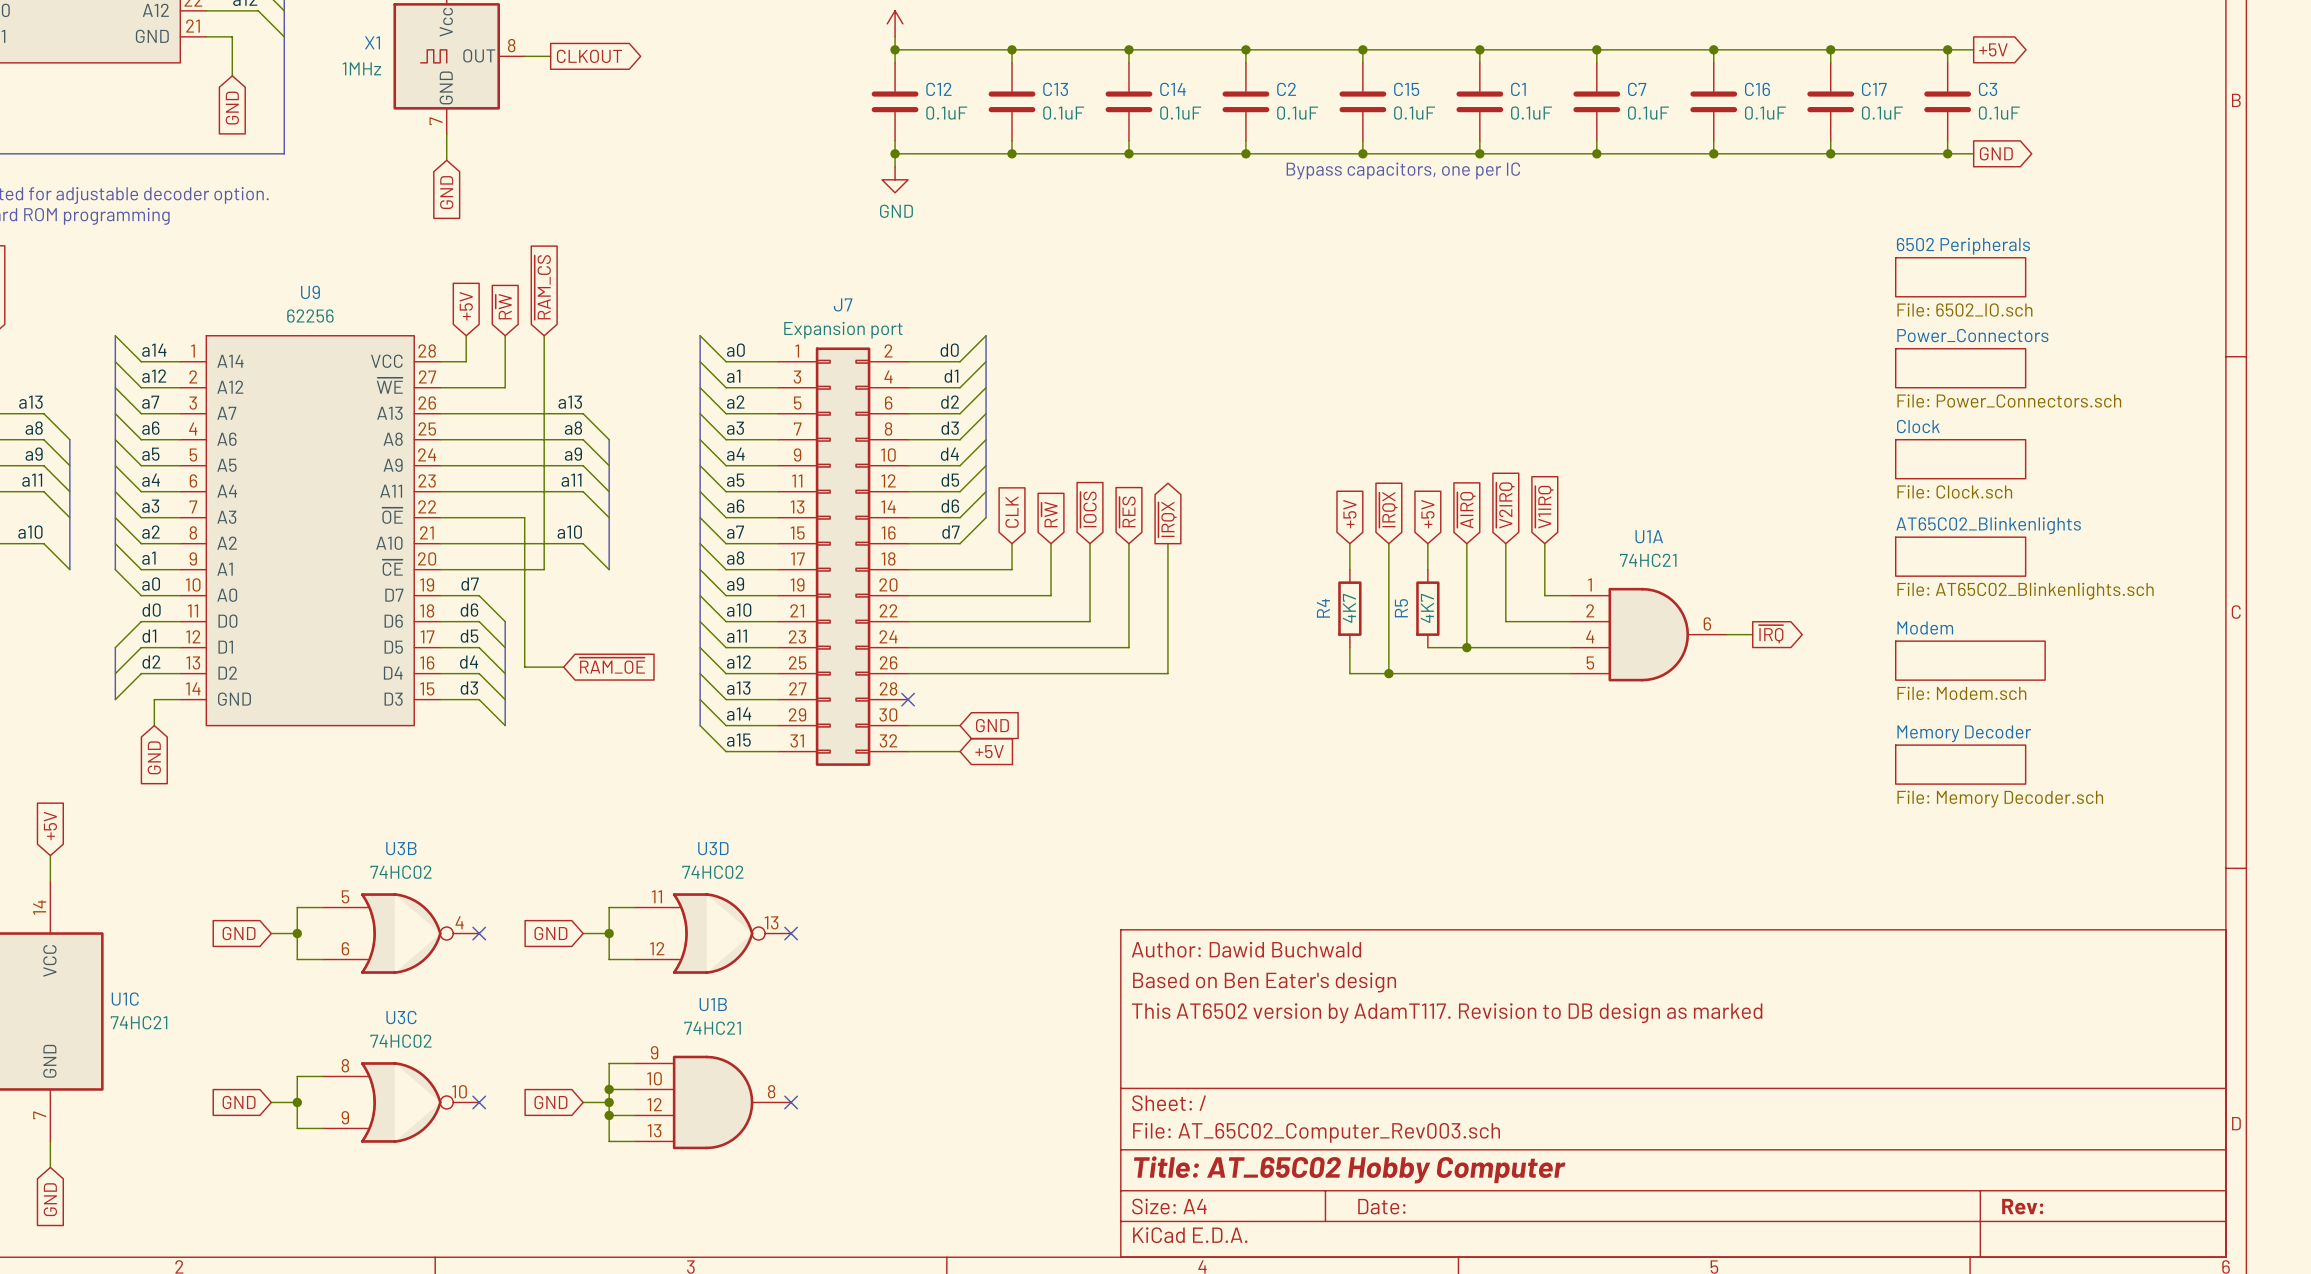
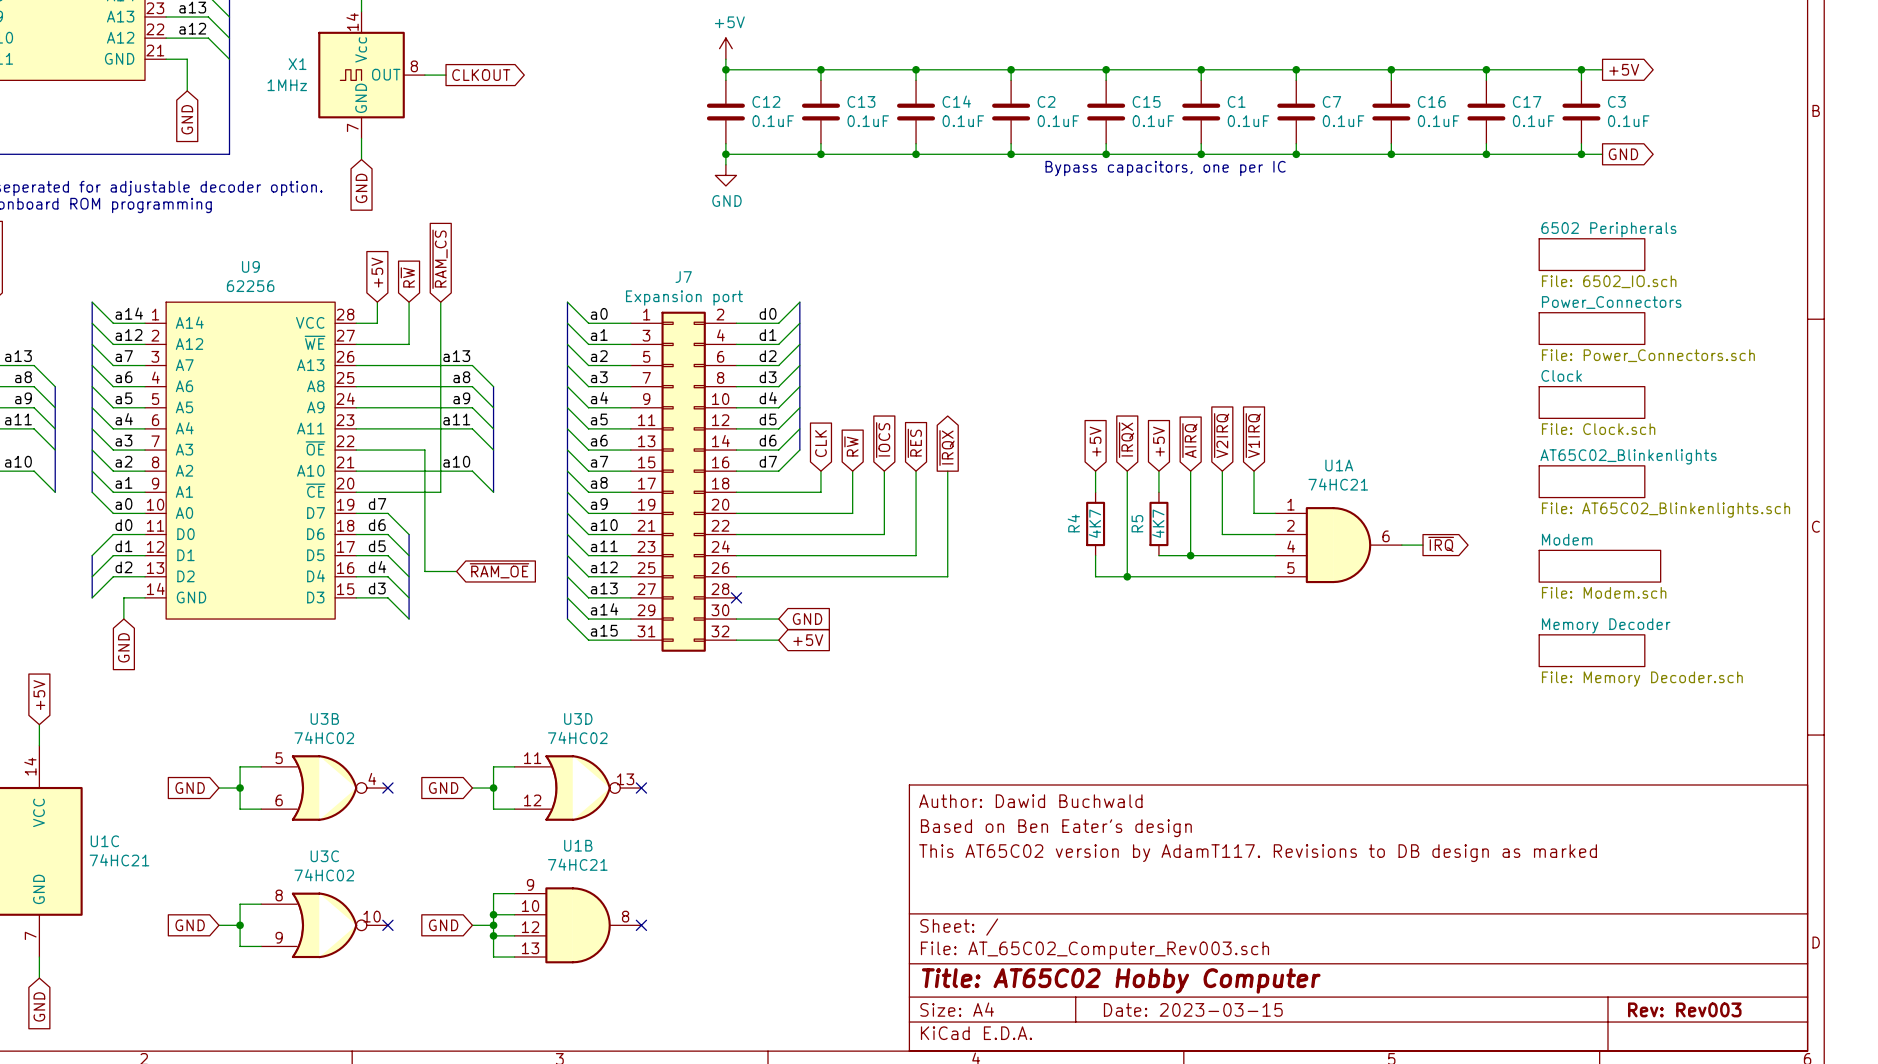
title block: This AT6502 version by AdamT117. Revision to DB design as marked (1447, 1013) -> This AT65C02 version by AdamT117. Revisions to DB design as marked (1258, 853)
title block: Title: AT_65C02 Hobby Computer (1349, 1169) -> Title: AT65C02 Hobby Computer (1121, 980)
title block: Date: (1381, 1206) -> Date: 2023-03-15 (1193, 1009)
title block: Rev: (2022, 1206) -> Rev: Rev003 (1684, 1009)

